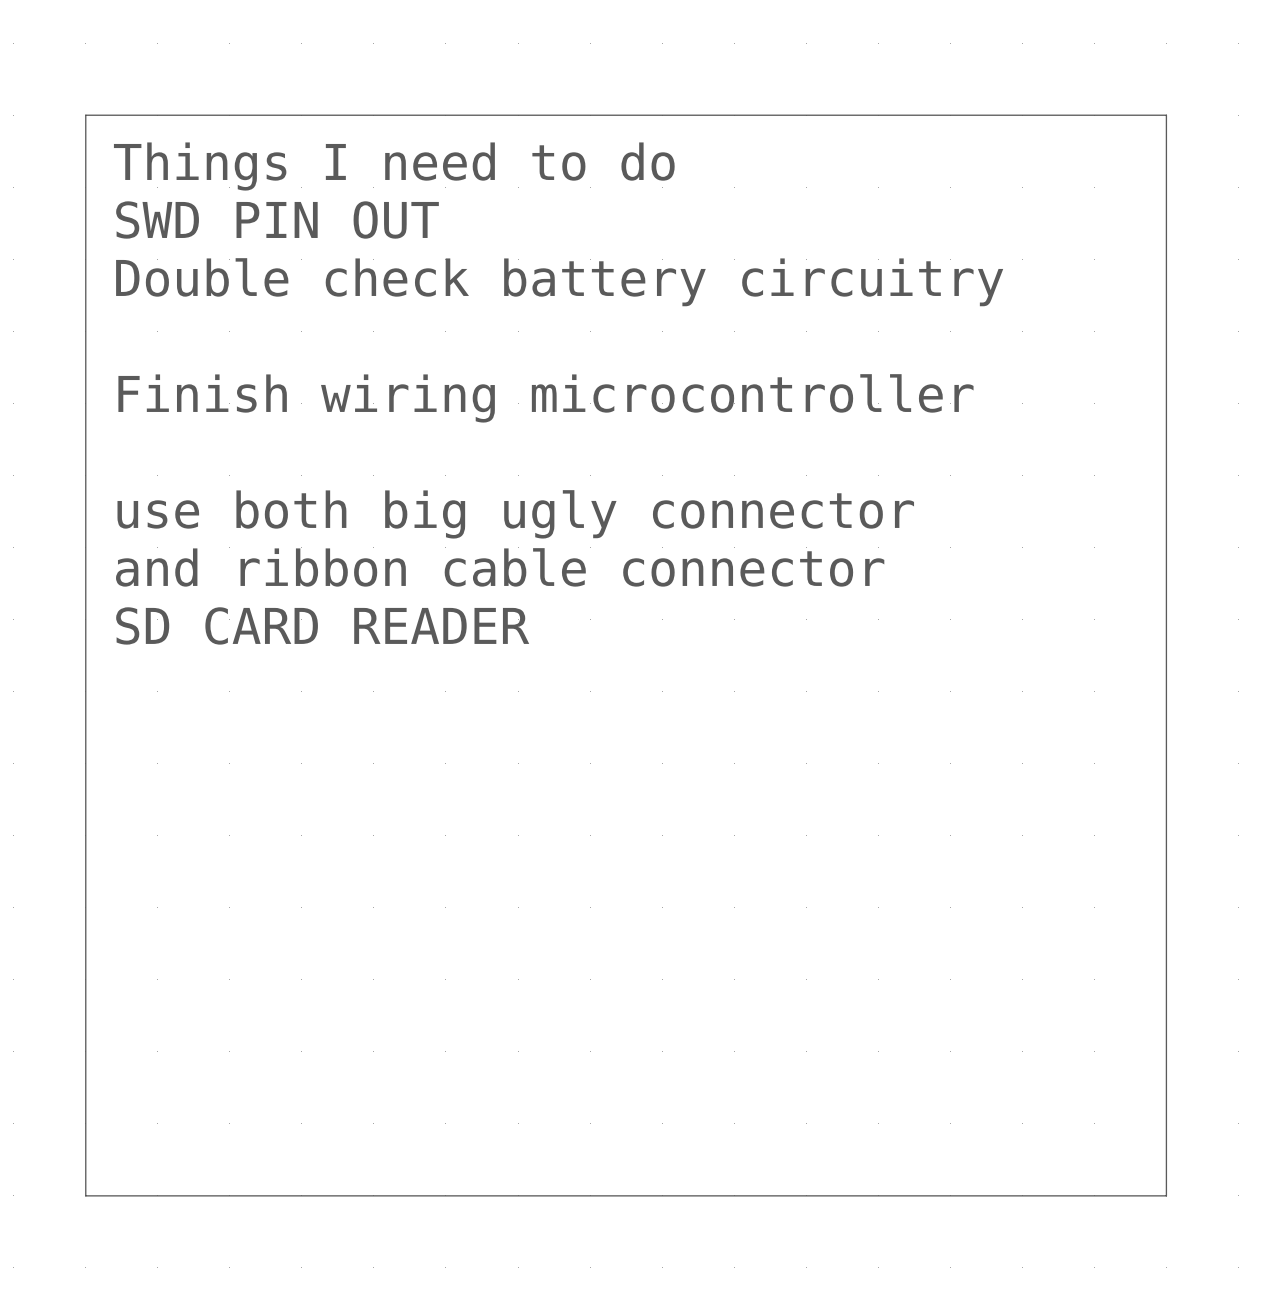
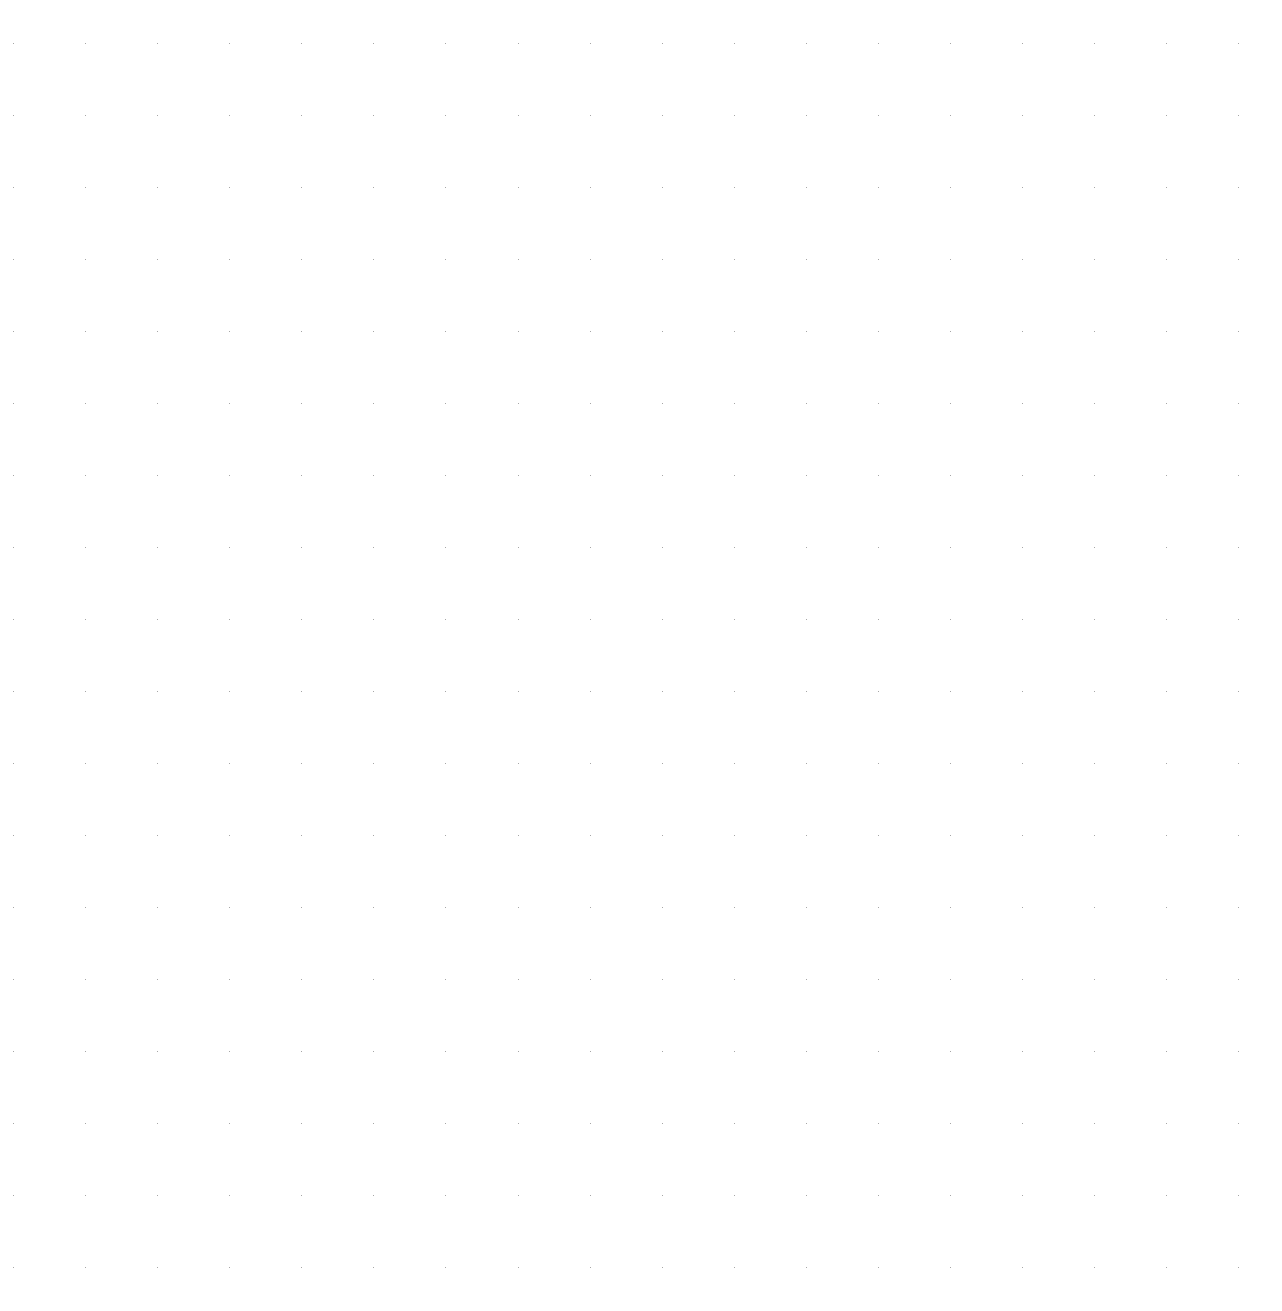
line: (85, 115) (1166, 115) (1166, 1195) (85, 1195) (85, 115) -> none
text: Things I need to do (394, 166) -> none
text: SWD PIN OUT (277, 219) -> none
text: Double check battery circuitry (559, 282) -> none
text: Finish wiring microcontroller (545, 398) -> none
text: use both big ugly connector (515, 514) -> none
text: and ribbon cable connector (500, 567) -> none
text: SD CARD READER (322, 625) -> none

